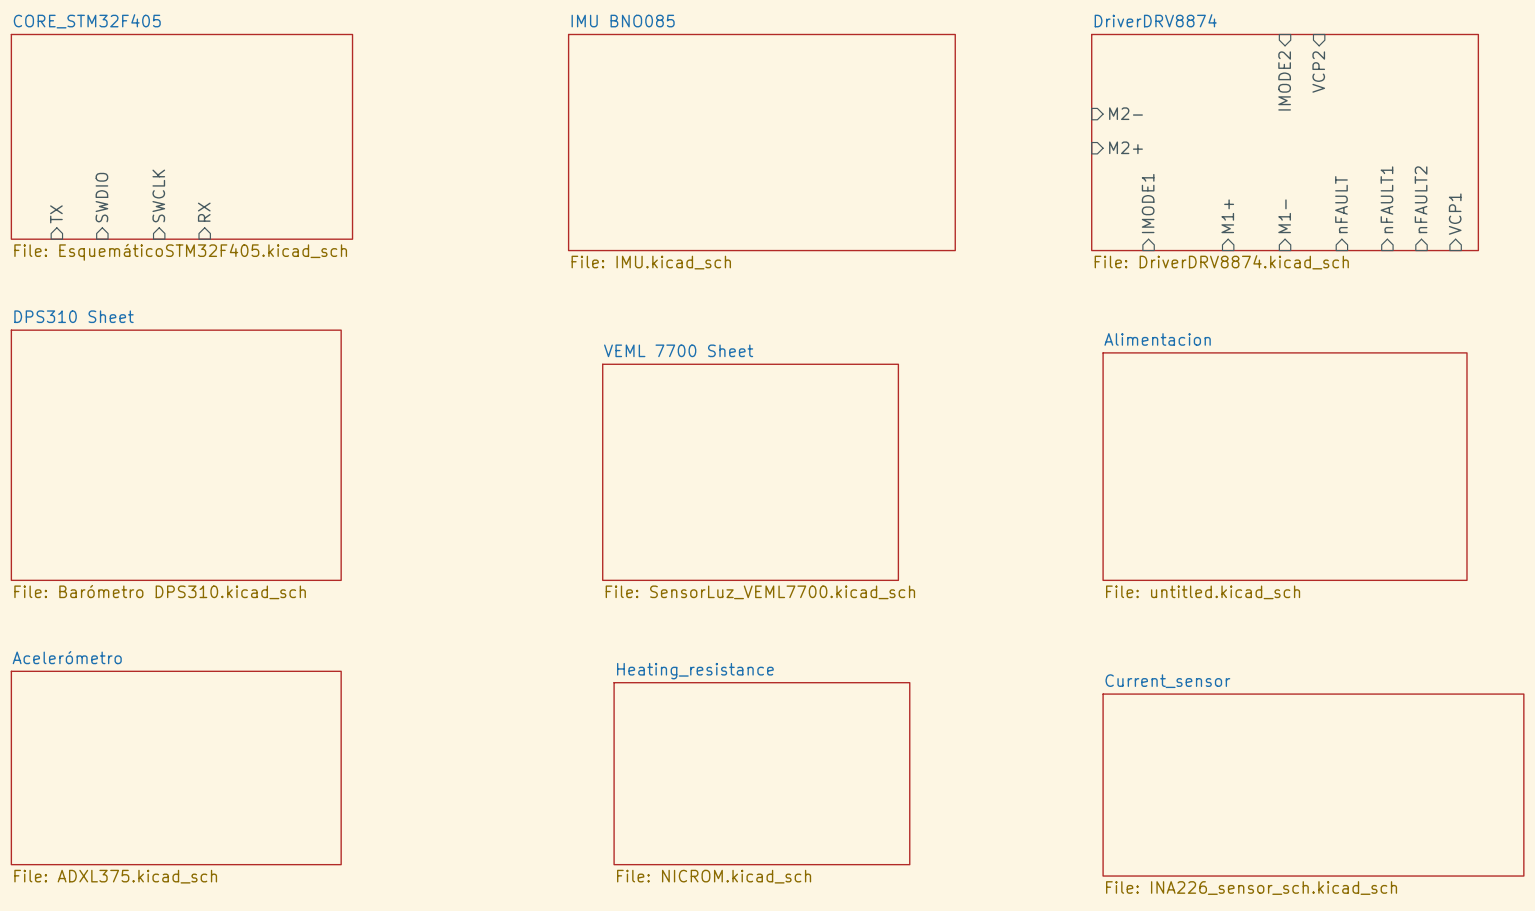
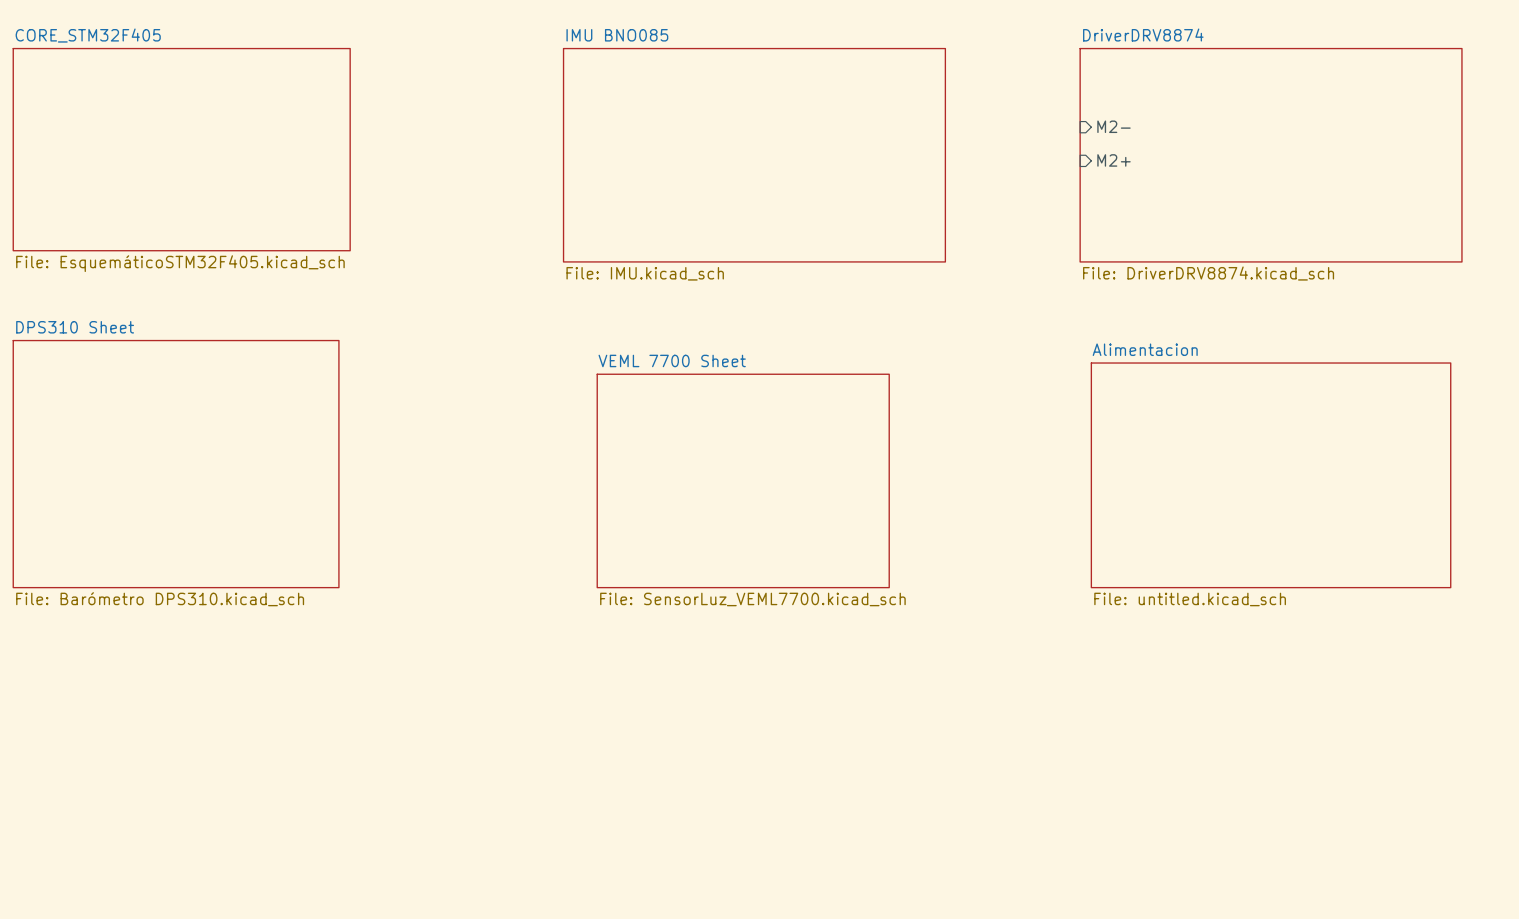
sheet pin: VCP2 (1318, 72) -> none
sheet pin: IMODE2 (1284, 80) -> none
sheet pin: SWCLK (158, 195) -> none
sheet pin: SWDIO (101, 197) -> none
sheet pin: nFAULT1 (1386, 199) -> none
sheet pin: nFAULT2 (1421, 199) -> none
sheet pin: IMODE1 (1148, 203) -> none
sheet pin: nFAULT (1341, 204) -> none
sheet pin: RX (204, 212) -> none
sheet pin: TX (56, 214) -> none
sheet pin: VCP1 (1455, 214) -> none
sheet pin: M1+ (1227, 216) -> none
sheet pin: M1- (1284, 216) -> none
sheet Acelerómetro: File: ADXL375.kicad_sch (176, 767) -> none
sheet Heating_resistance: File: NICROM.kicad_sch (761, 773) -> none
sheet Current_sensor: File: INA226_sensor_sch.kicad_sch (1313, 785) -> none

